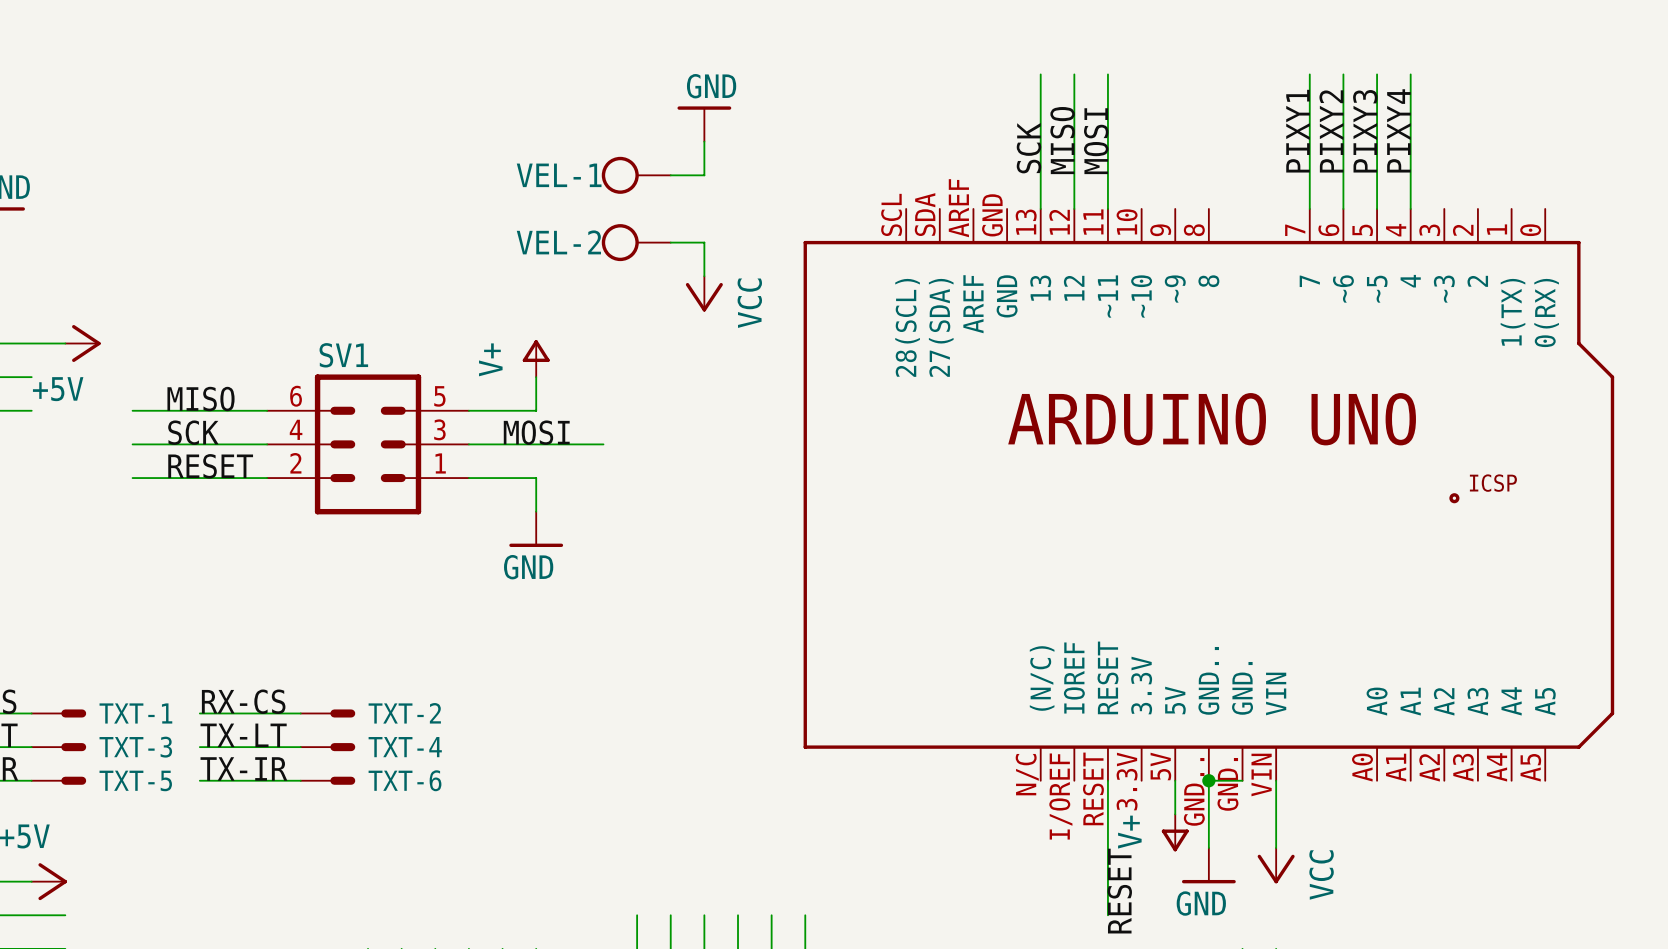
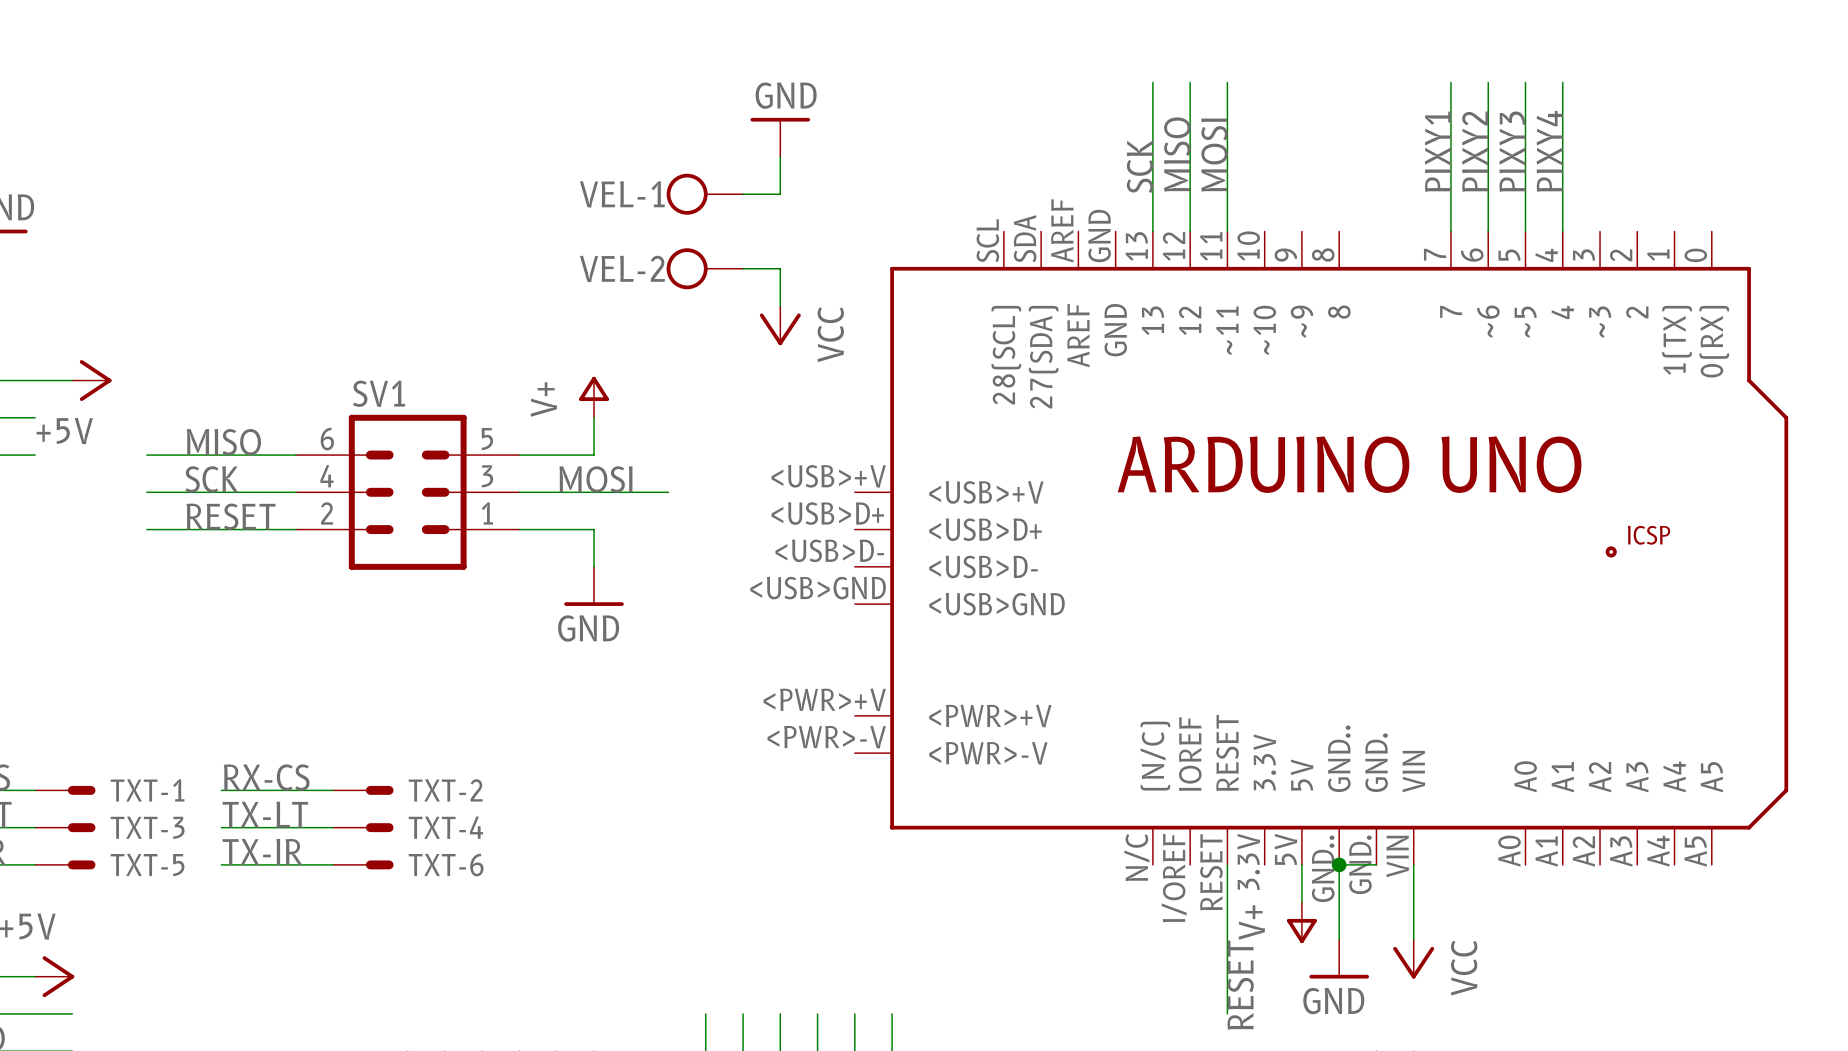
part: none -> (1321, 548)
part: (1208, 494) -> none

